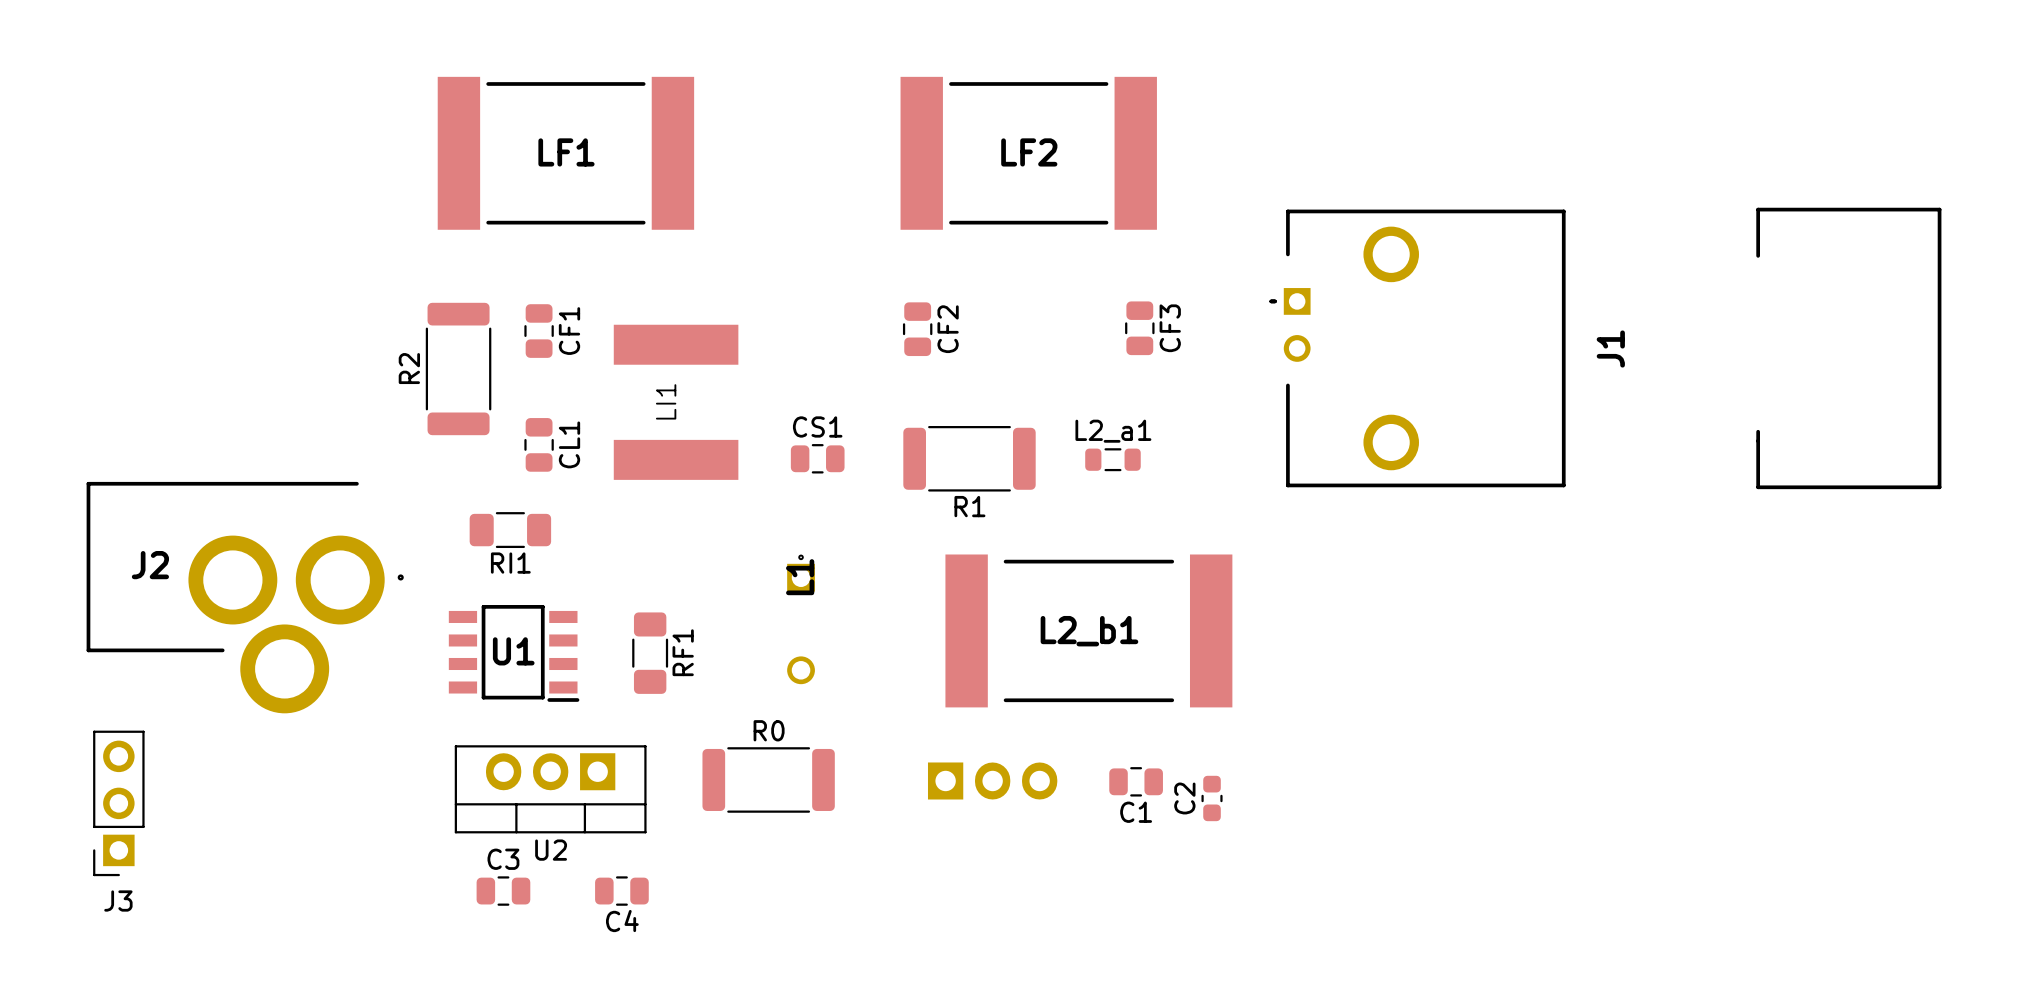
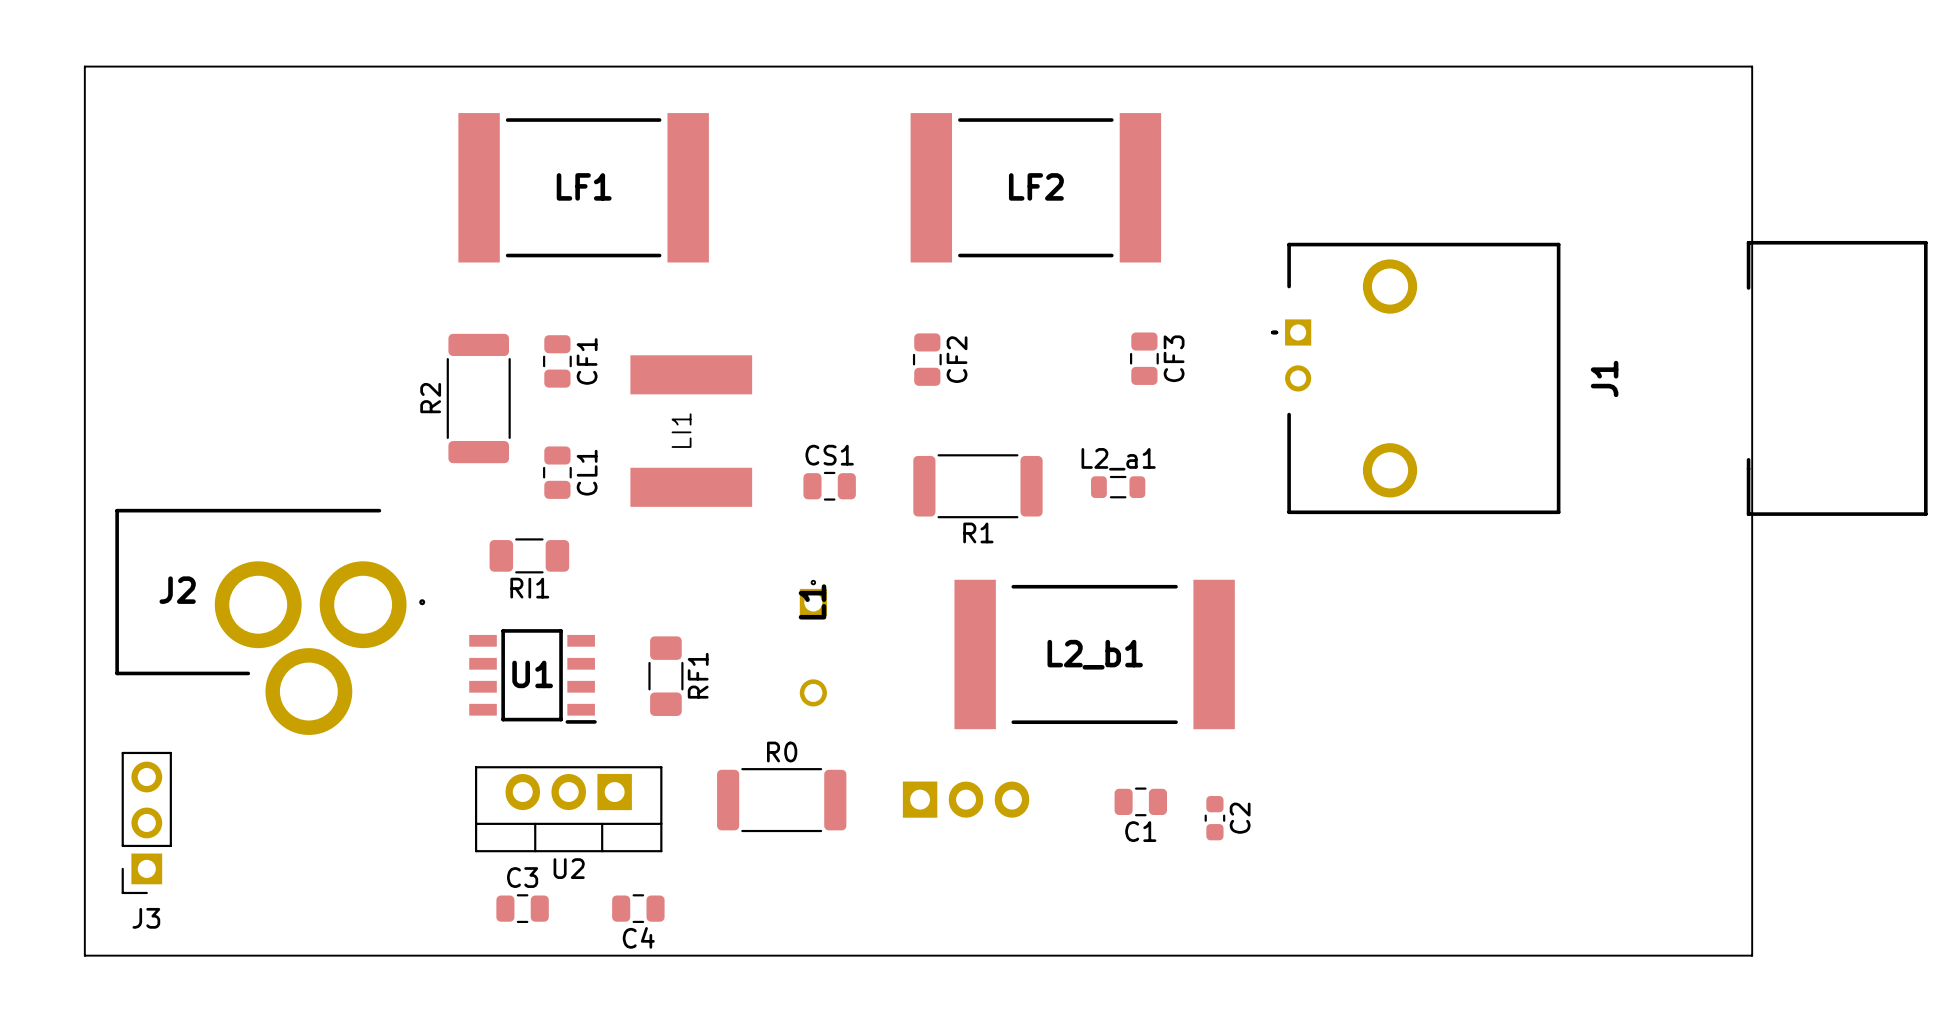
board edge: none -> (84, 66) (1752, 66) (1752, 955) (84, 955) (84, 66)
part position: (992, 780) -> (966, 799)
C2 name position: C2 (1184, 798) -> C2 (1240, 818)

